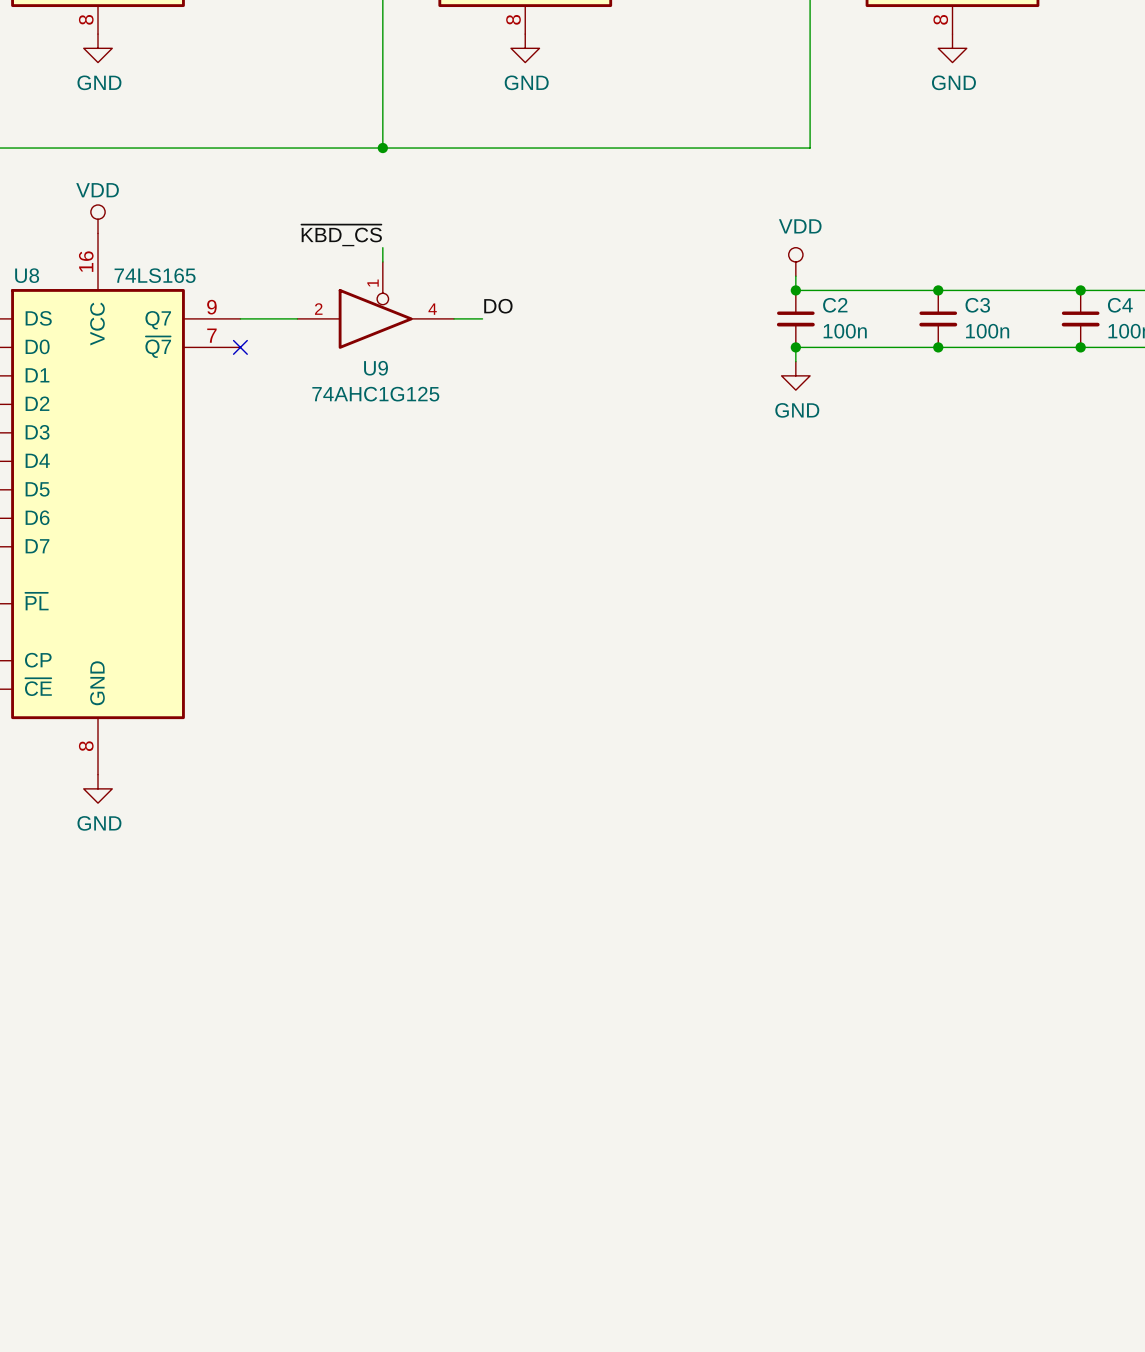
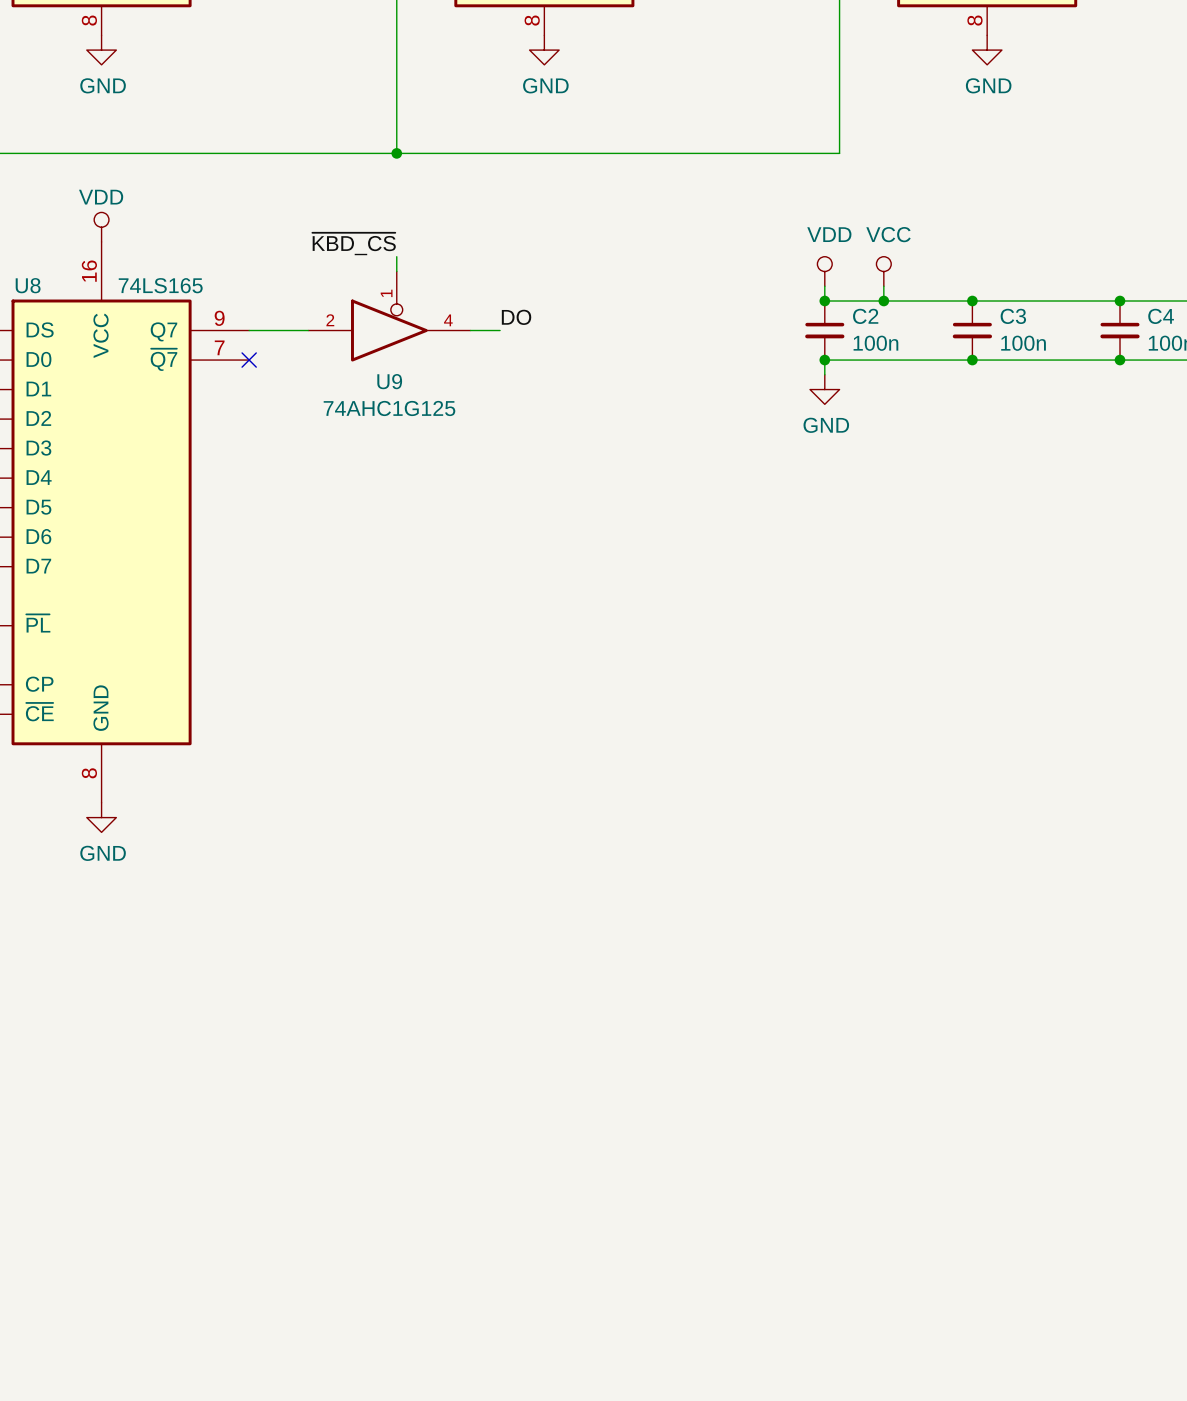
power symbol: none -> VCC (883, 271)
wire: none -> (883, 286) (883, 301)
junction: none -> (883, 301)

